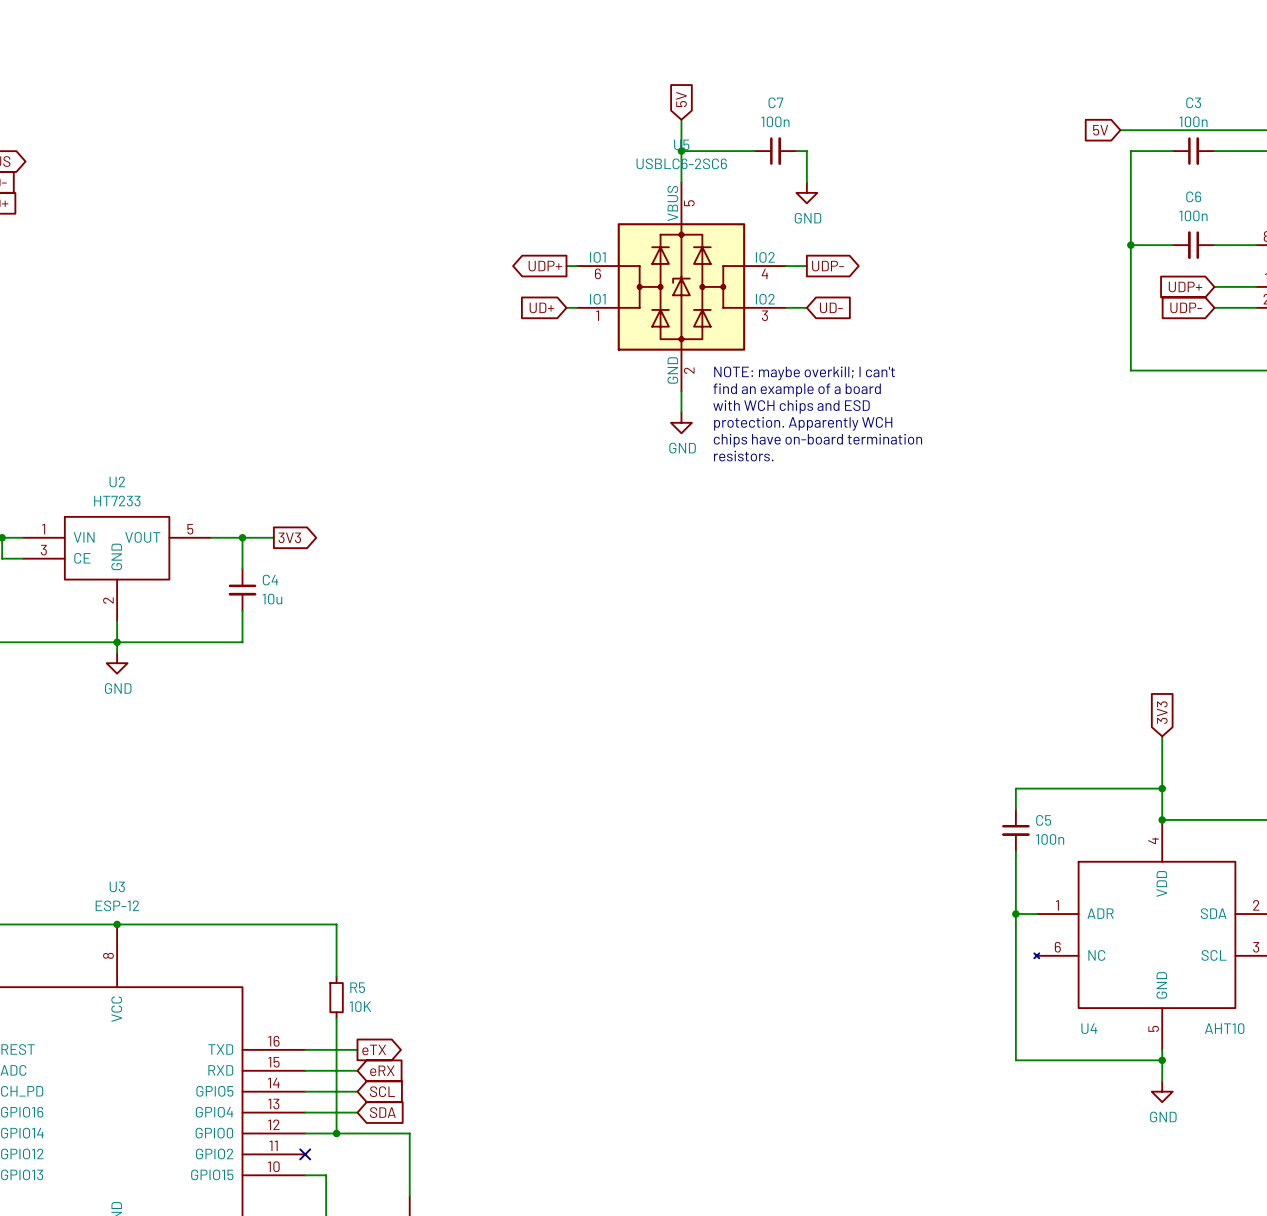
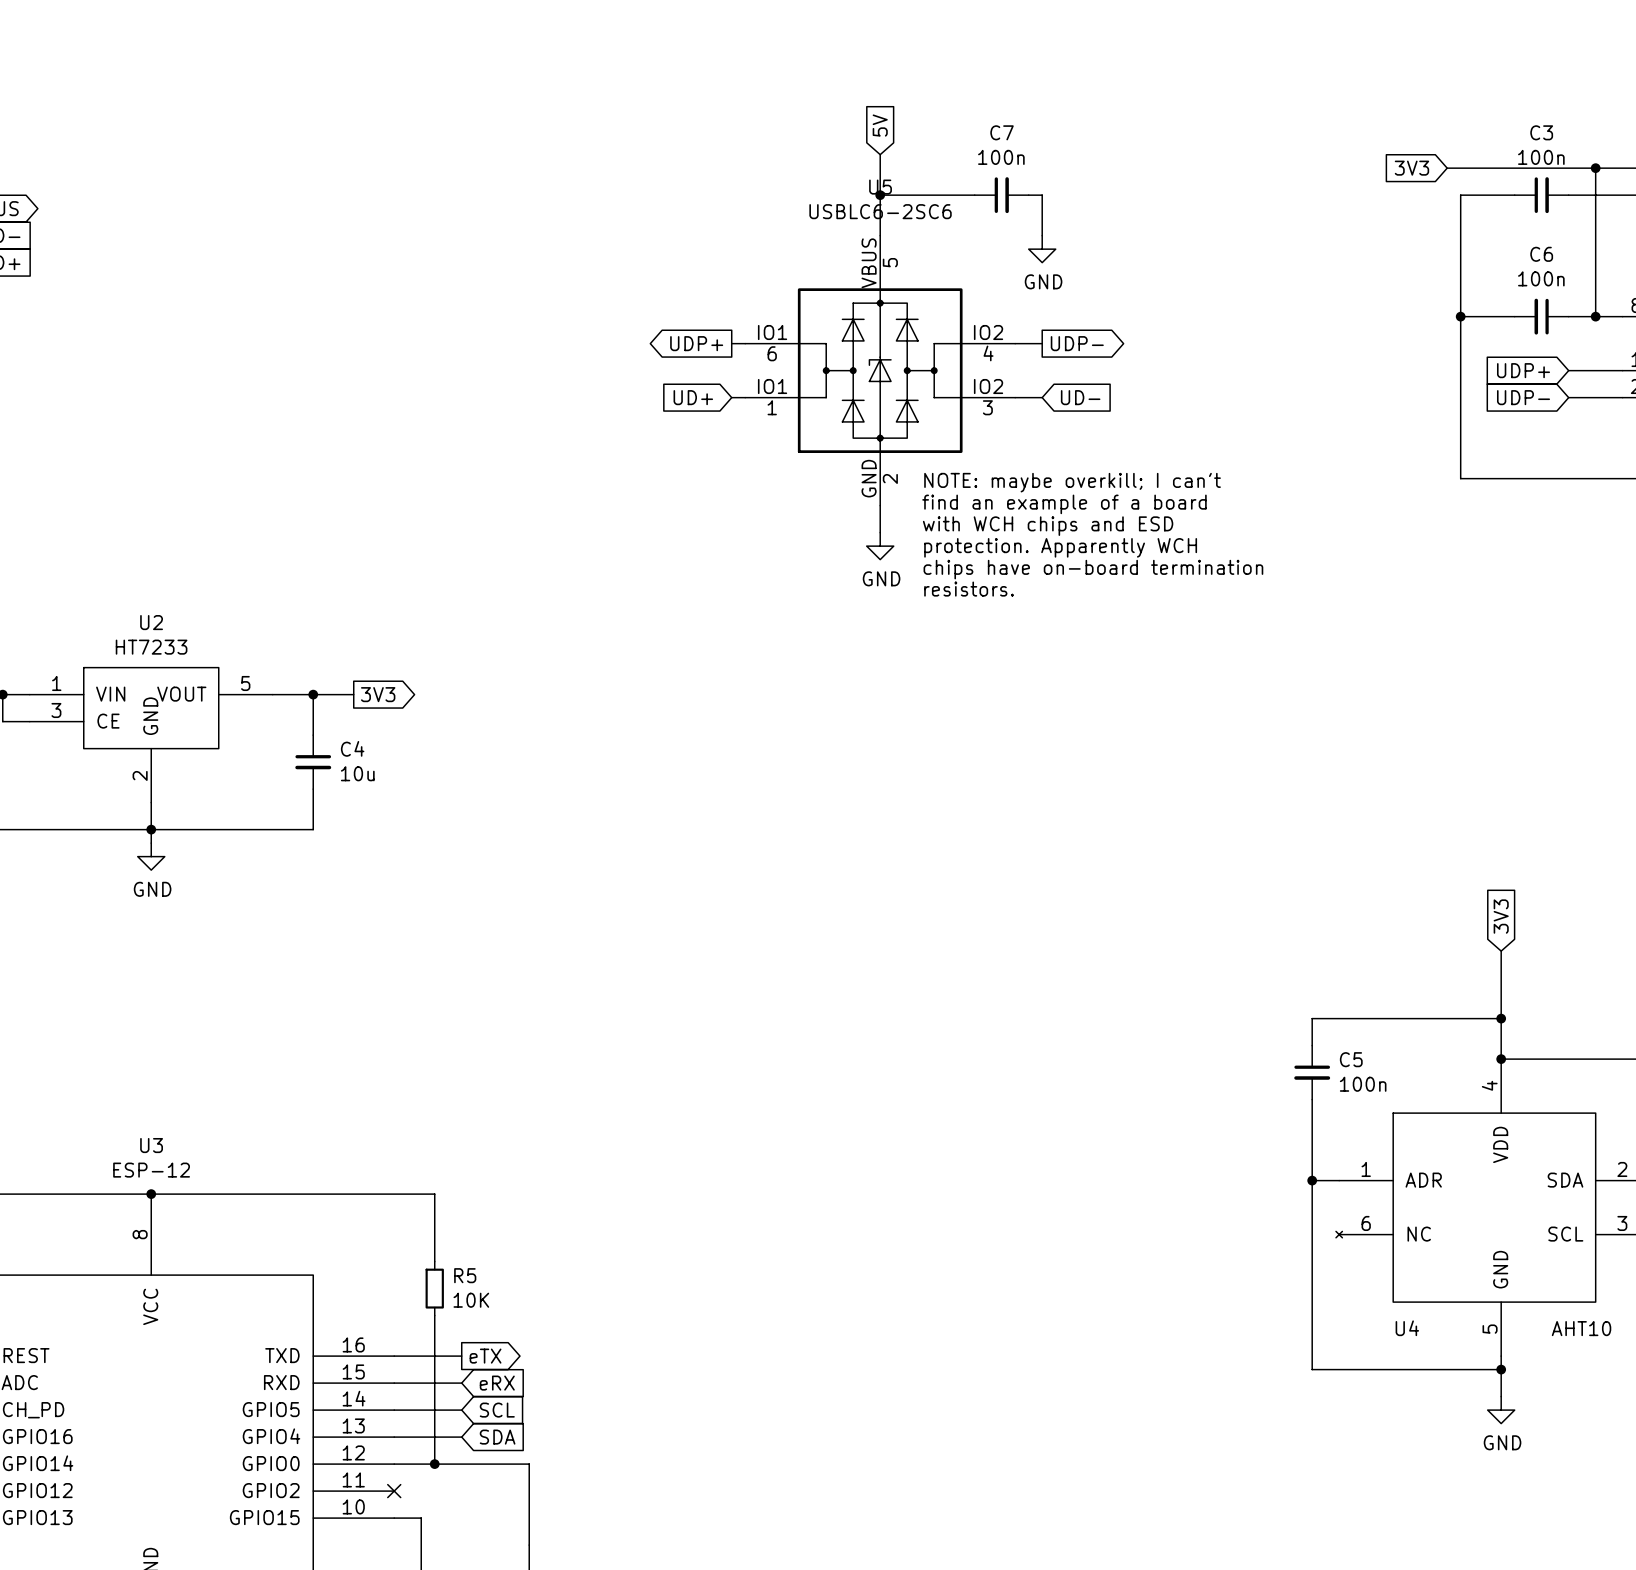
global label: 5V (1100, 130) -> 3V3 (1411, 168)
wire: none -> (1595, 168) (1595, 316)
junction: none -> (1595, 168)
junction: none -> (1595, 316)

